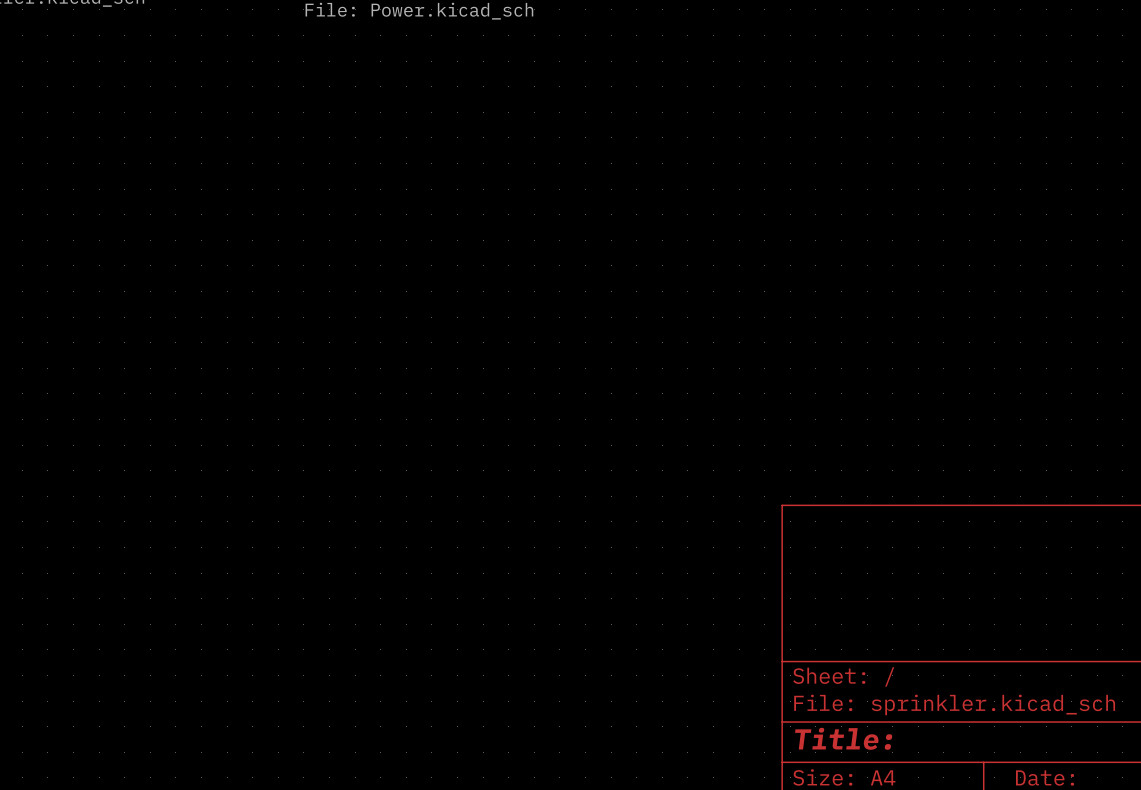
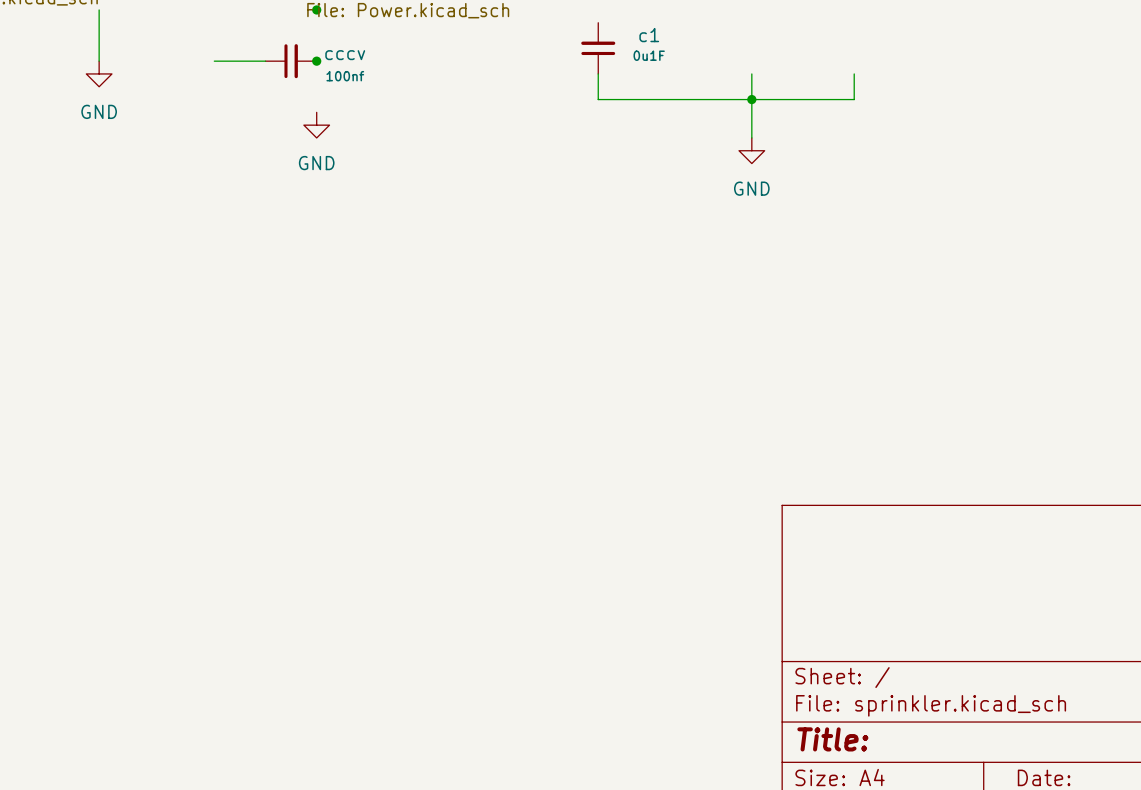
wire: none -> (99, 9) (99, 61)
junction: none -> (316, 9)
c1: none -> 0u1F (598, 48)
wire: none -> (214, 61) (265, 61)
cccv: none -> 100nf (291, 61)
junction: none -> (316, 61)
power symbol: none -> GND (99, 73)
wire: none -> (598, 73) (598, 99) (854, 99) (854, 73)
wire: none -> (751, 73) (751, 137)
junction: none -> (751, 99)
power symbol: none -> GND (316, 125)
power symbol: none -> GND (751, 150)

